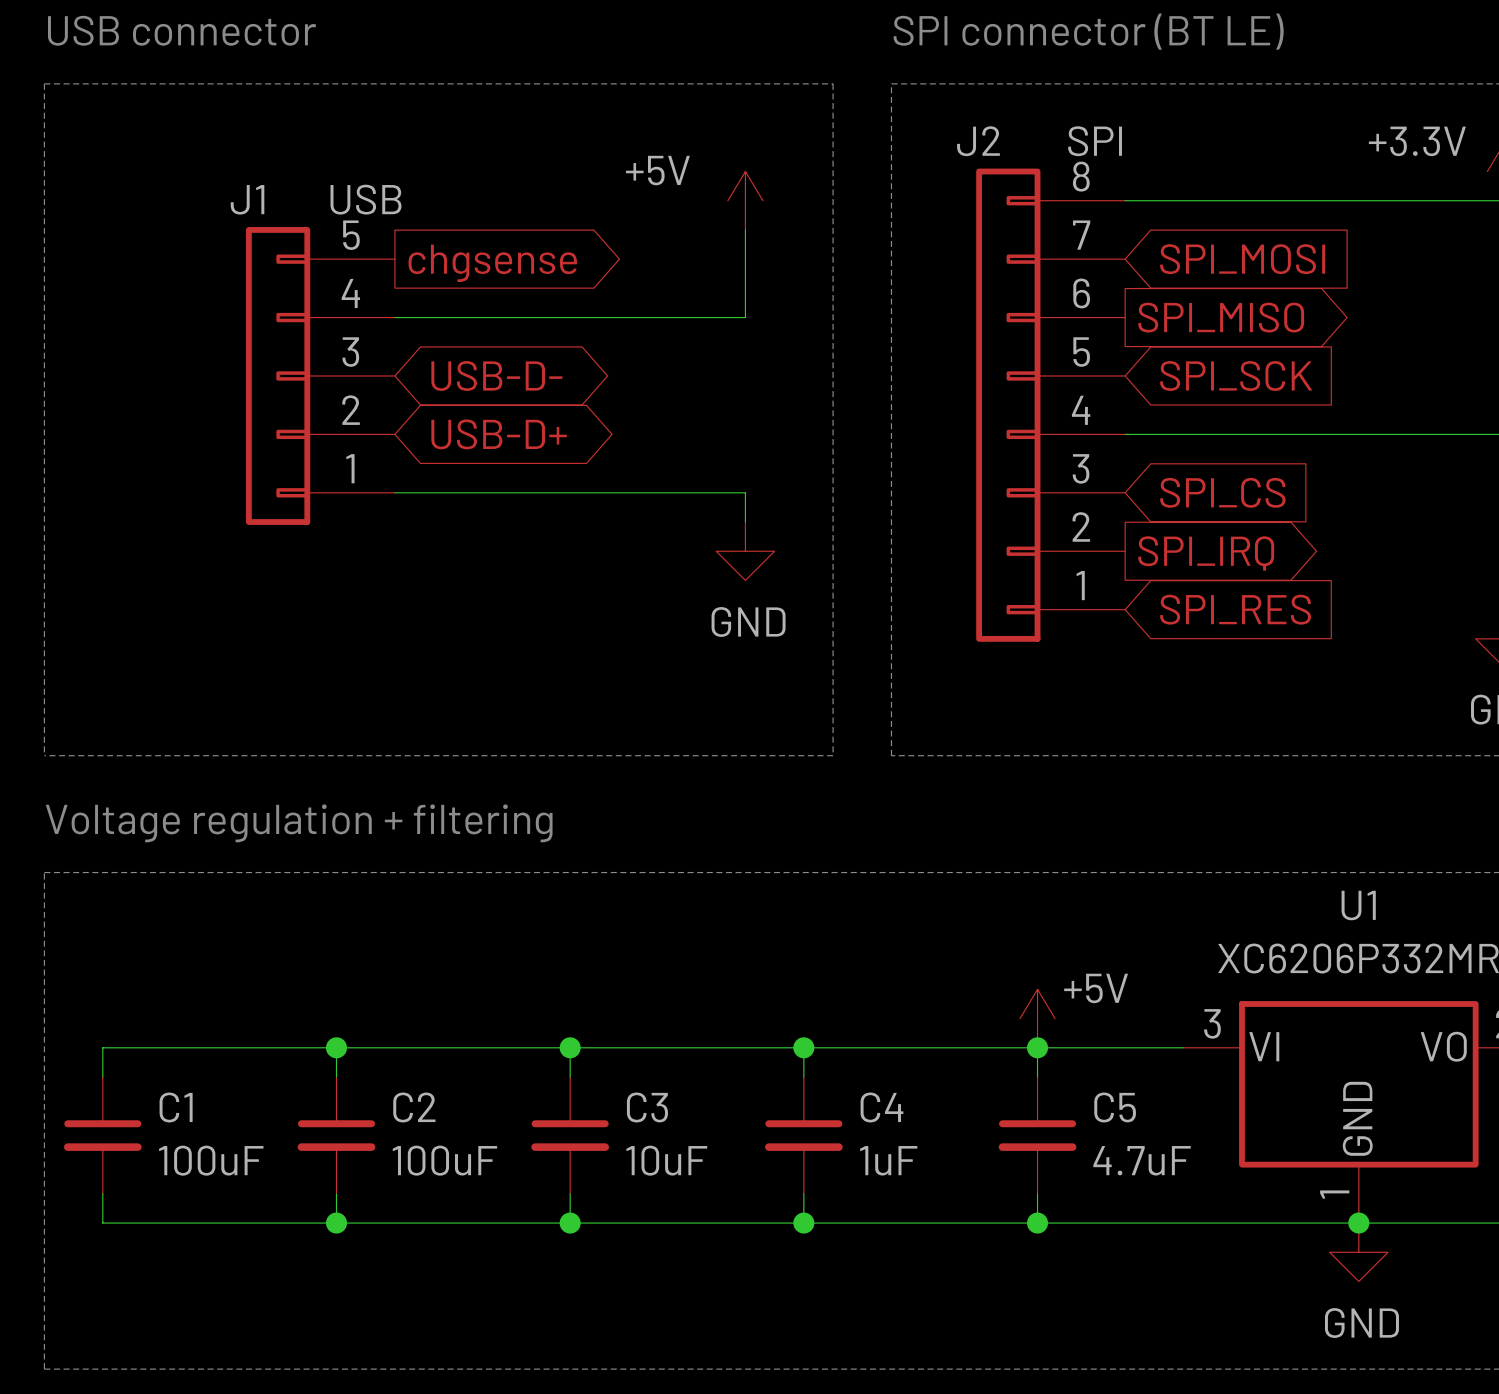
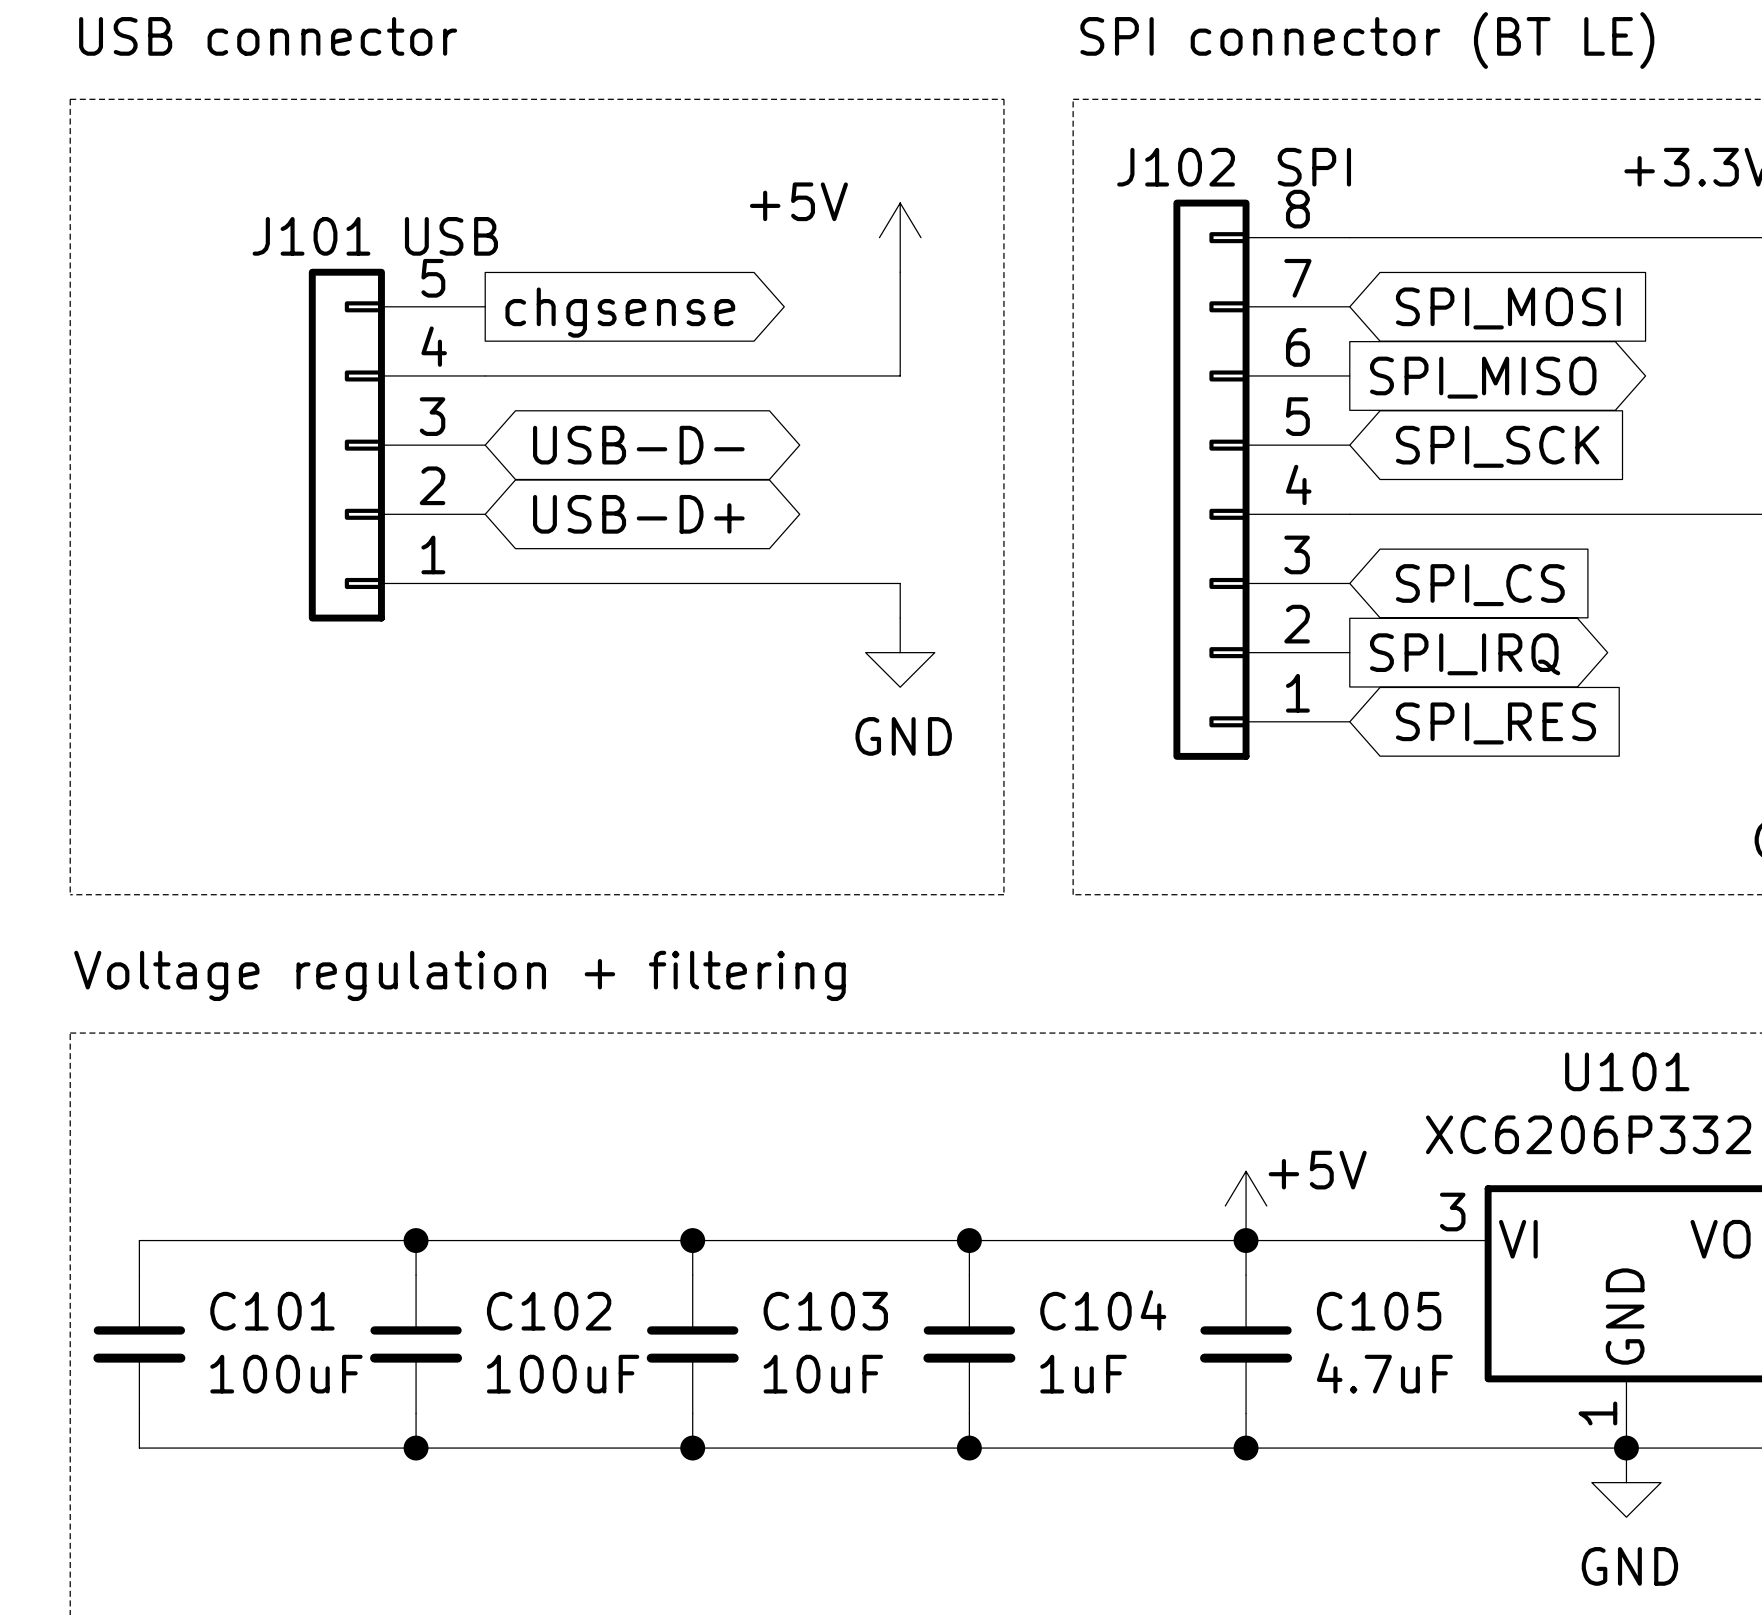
J2 name: J2 (978, 141) -> J102 (1176, 167)
J1 name: J1 (247, 199) -> J101 (311, 236)
U1 name: U1 (1358, 905) -> U101 (1627, 1071)
C1 name: C1 (176, 1107) -> C101 (272, 1311)
C2 name: C2 (414, 1107) -> C102 (549, 1311)
C3 name: C3 (647, 1107) -> C103 (825, 1311)
C4 name: C4 (881, 1107) -> C104 (1103, 1310)
C5 name: C5 (1115, 1107) -> C105 (1379, 1311)

